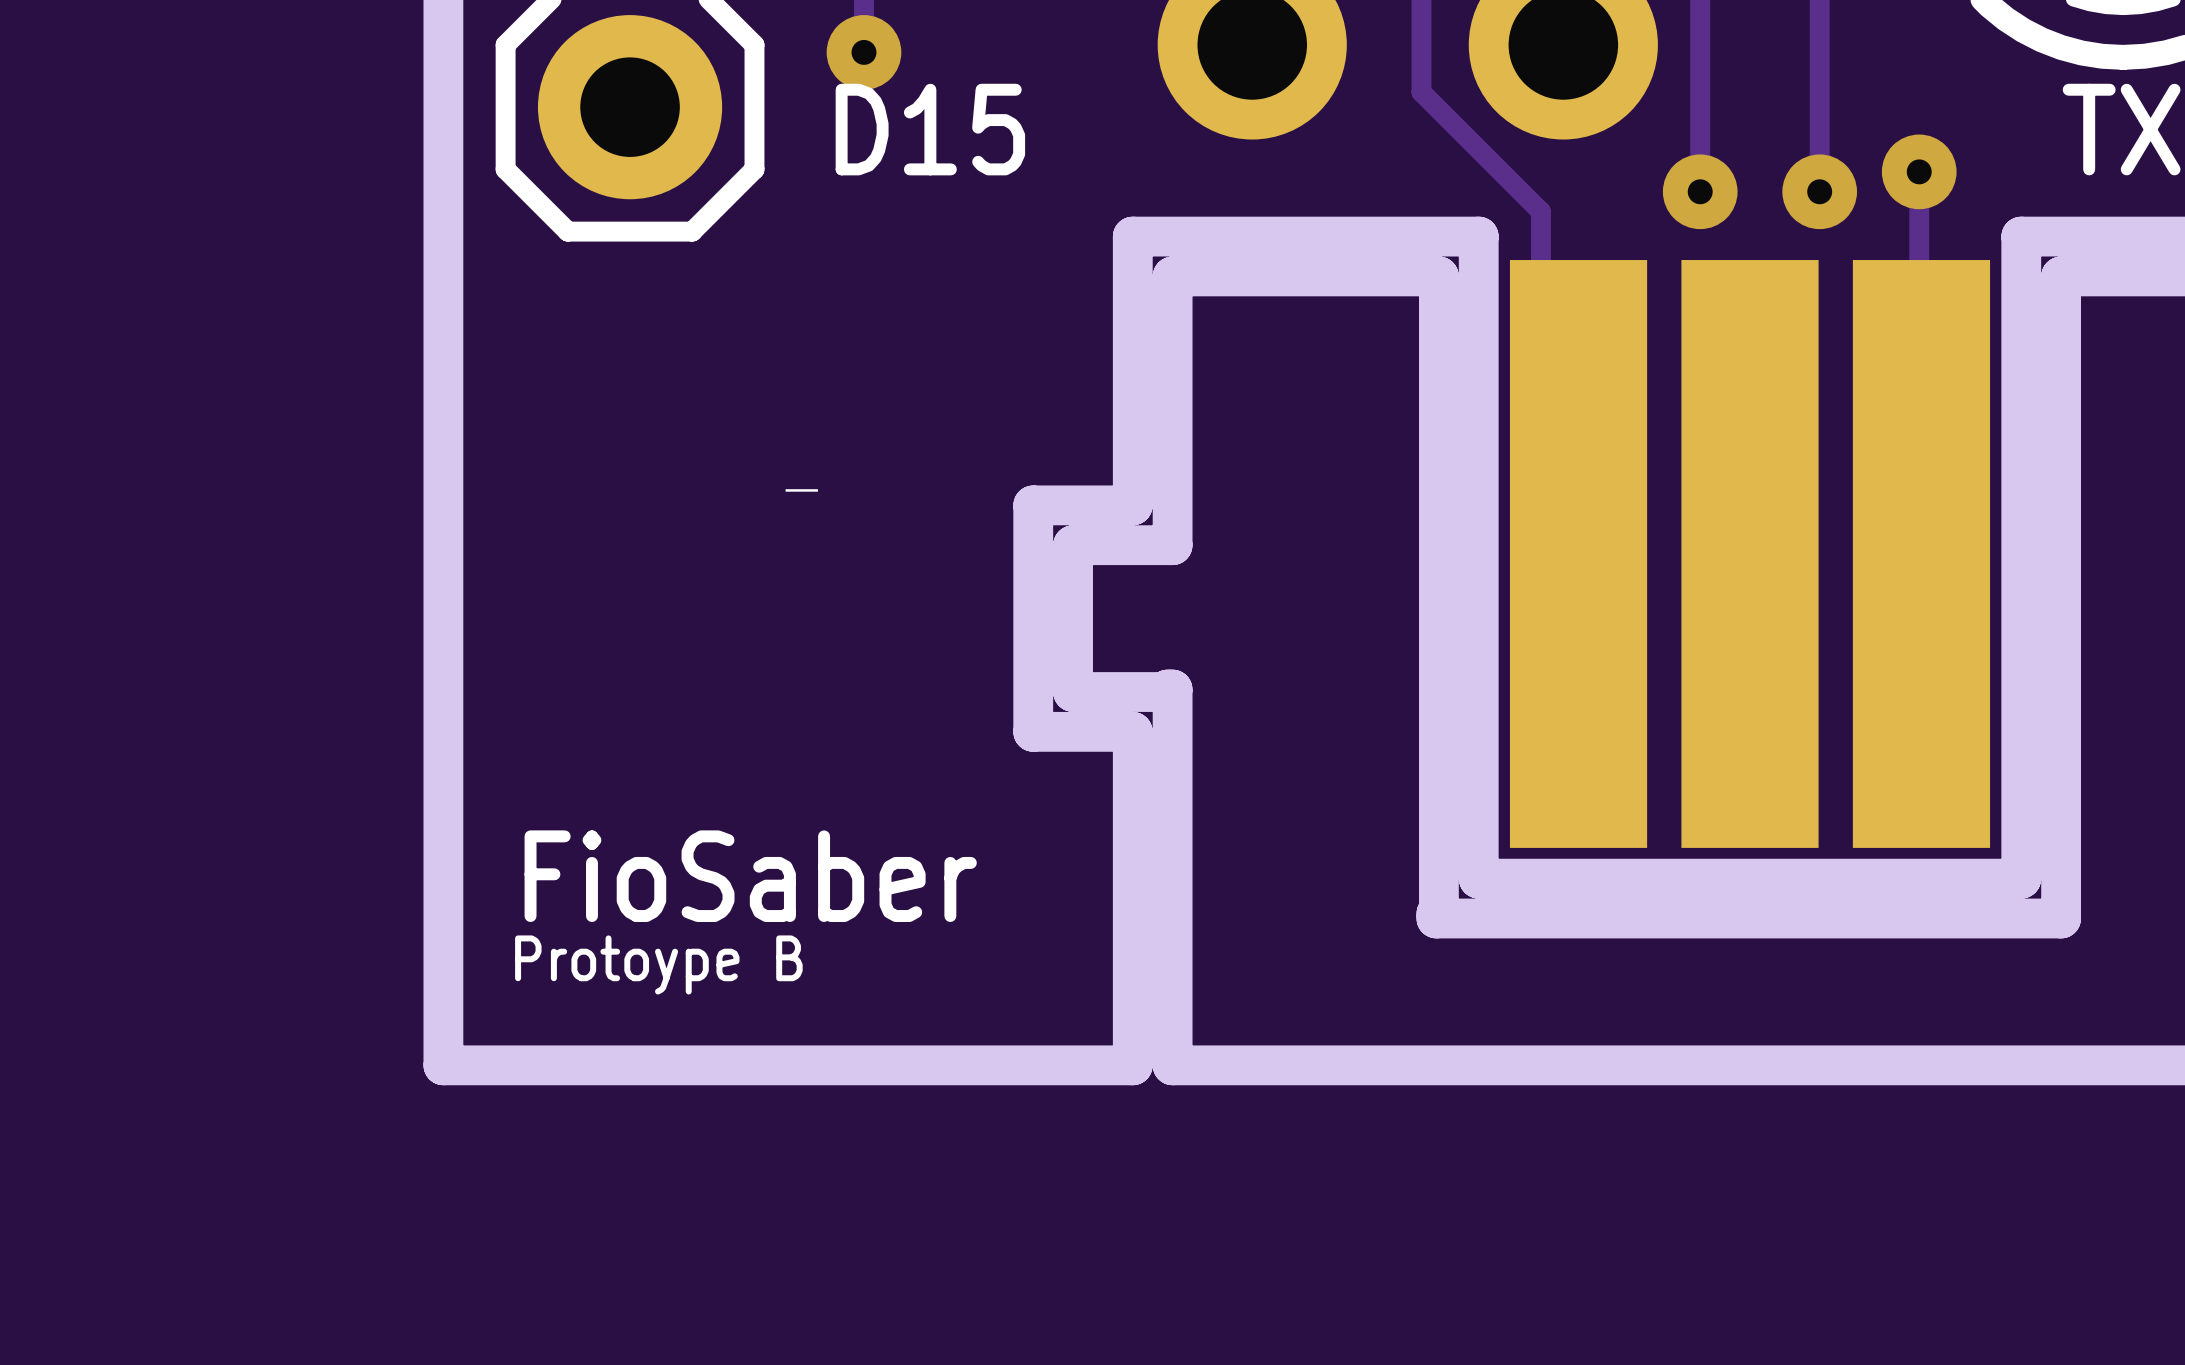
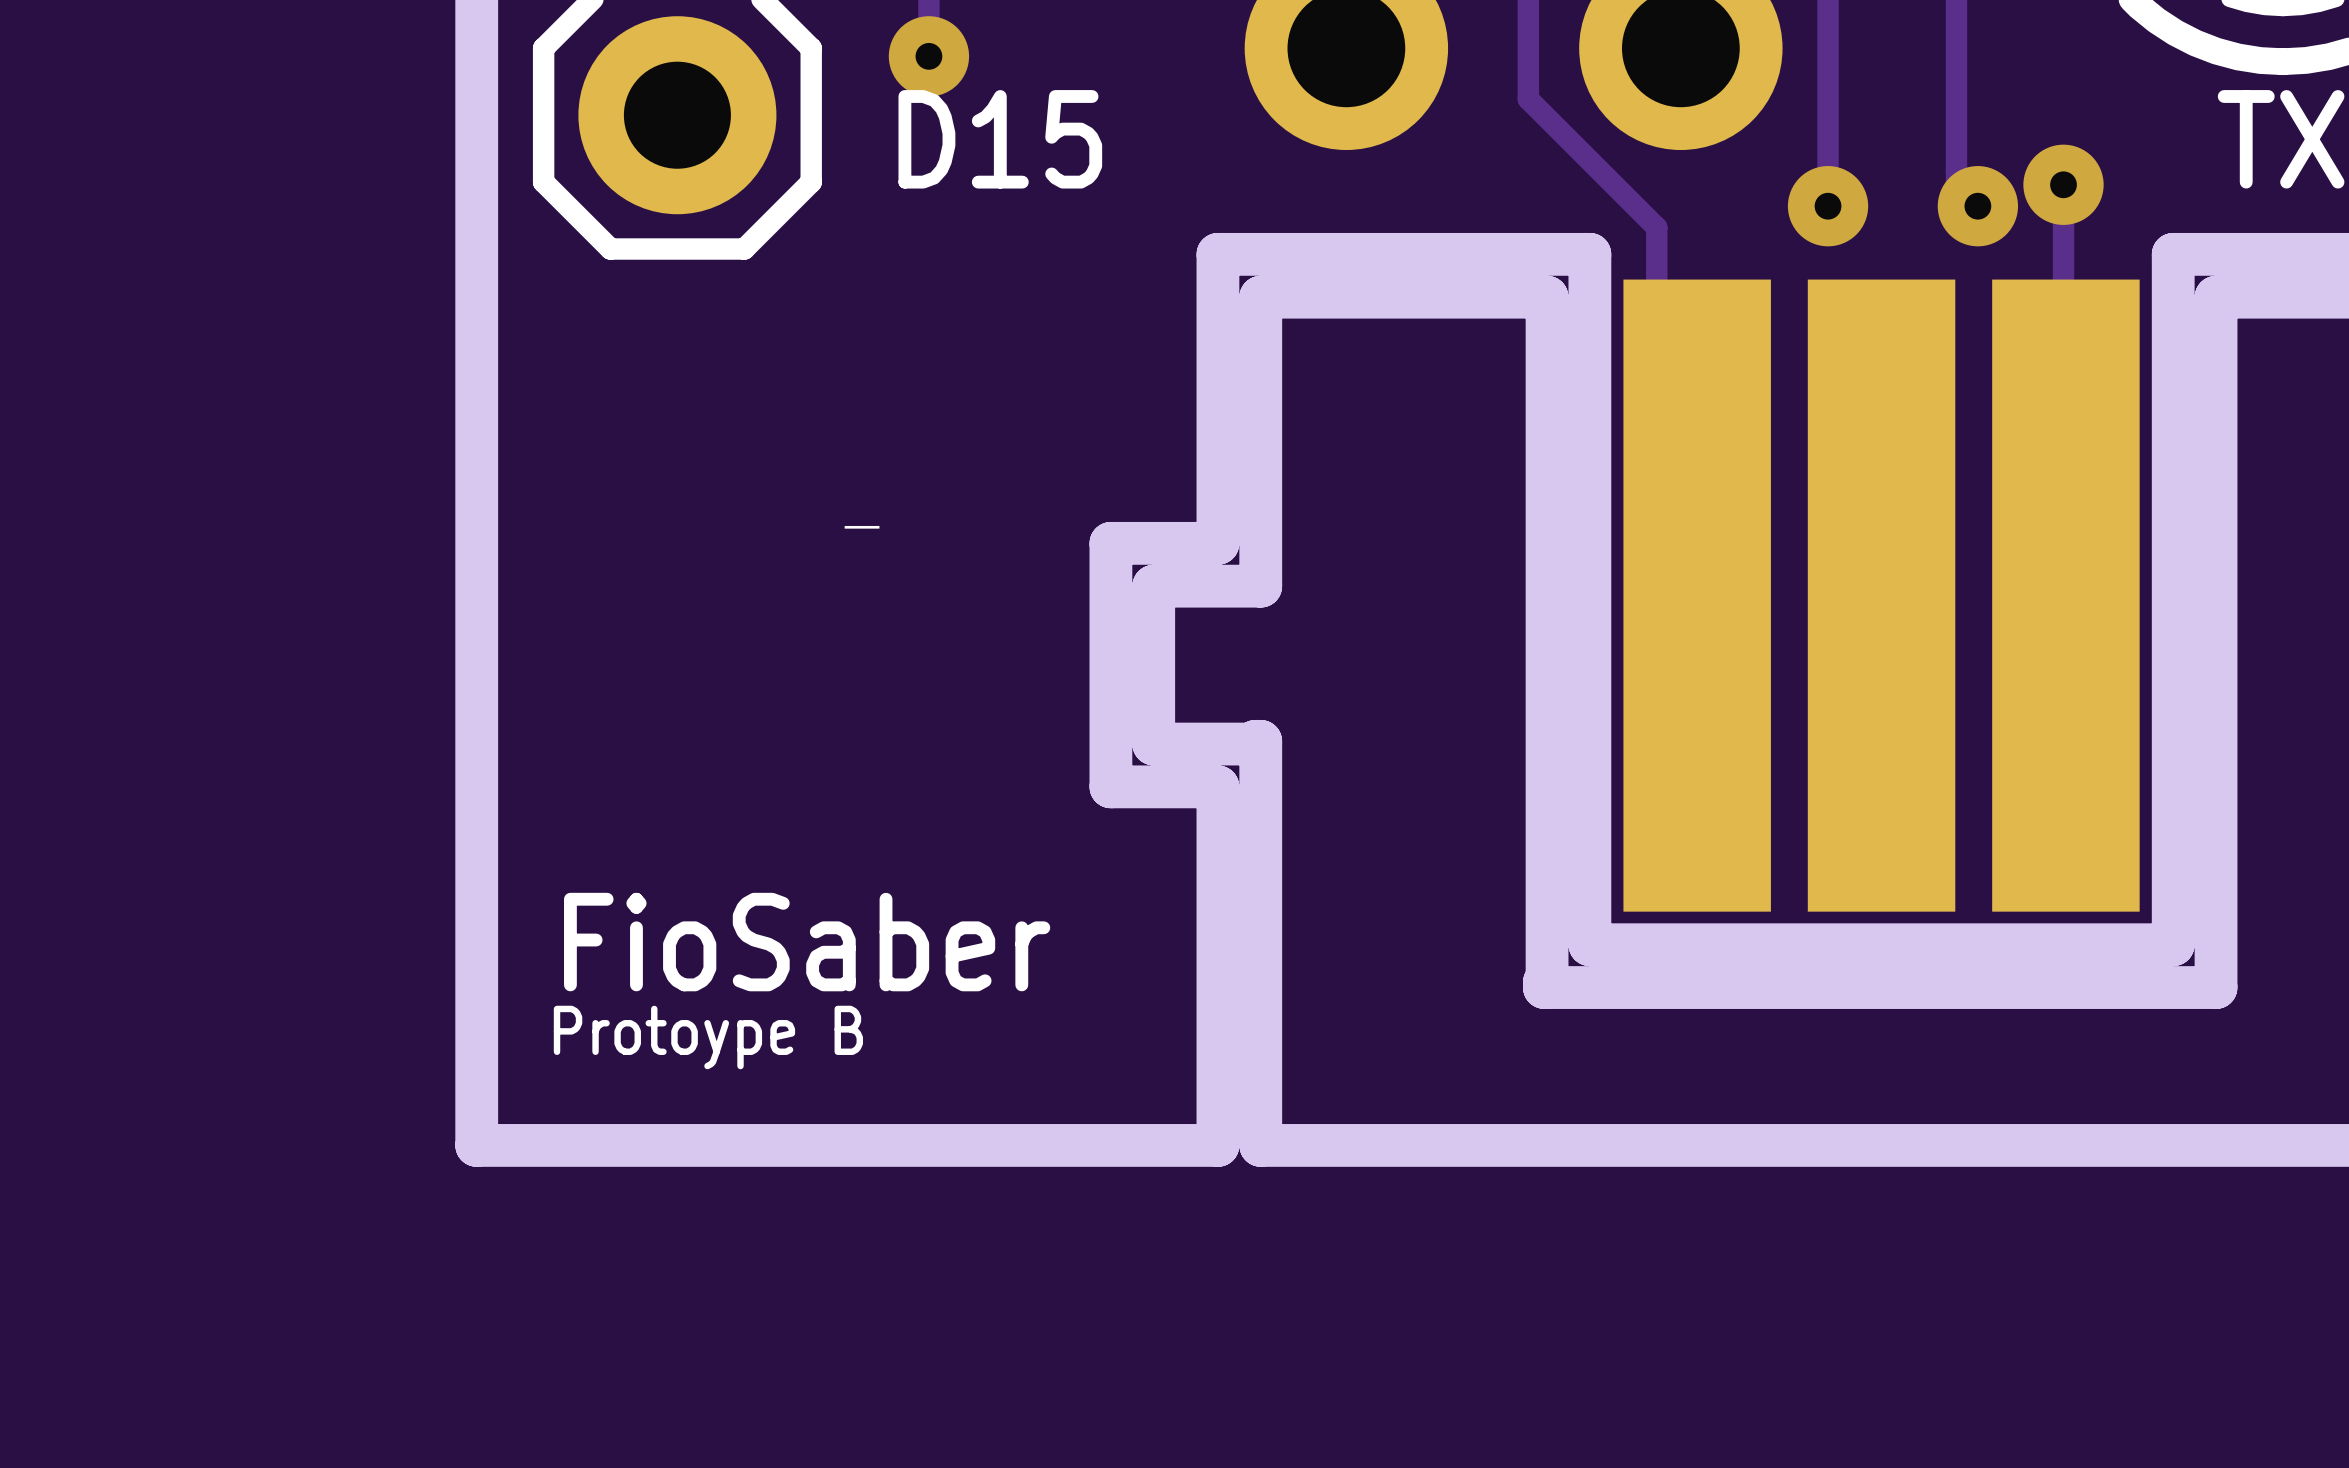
via position: (1819, 191) -> (1977, 206)

